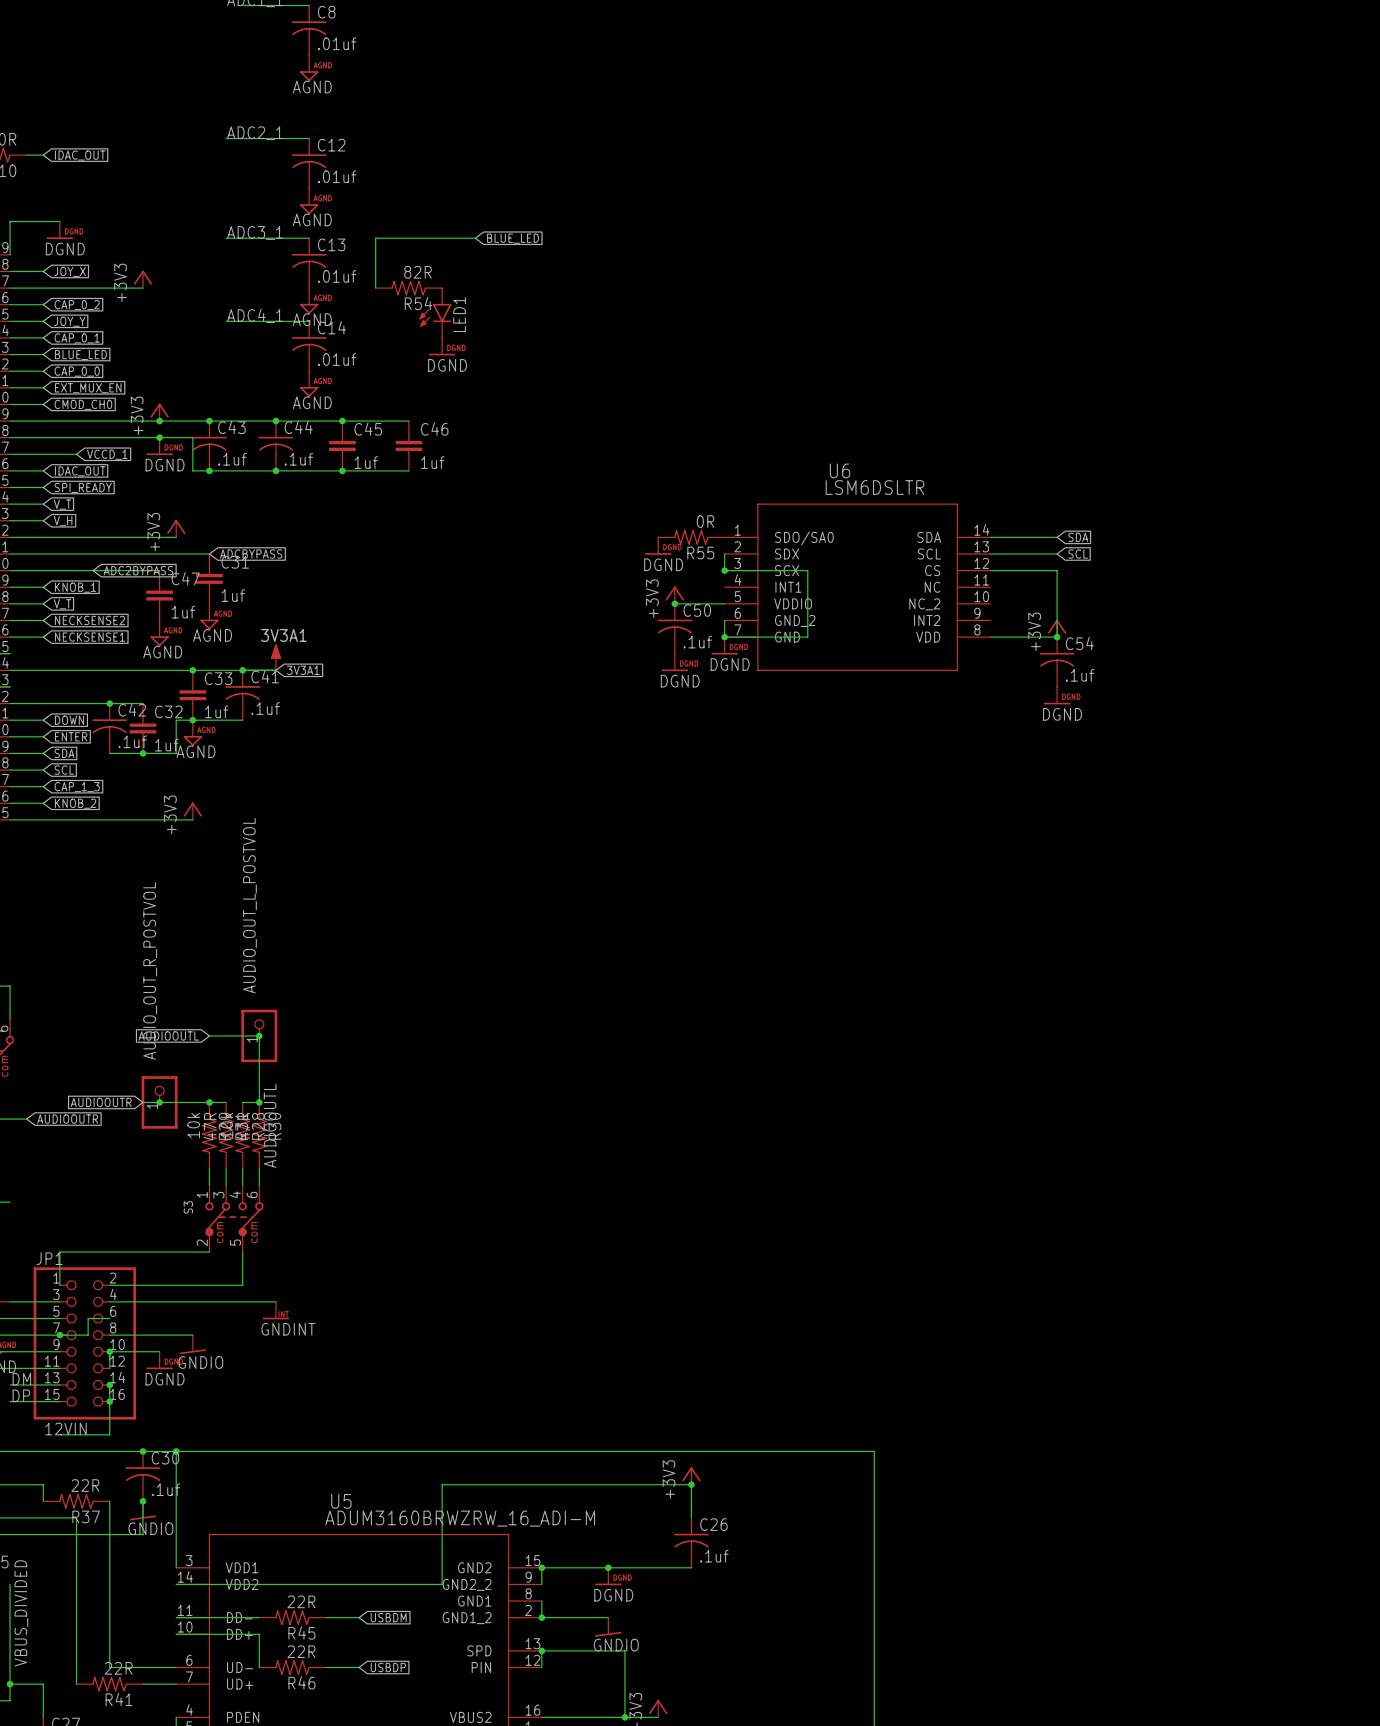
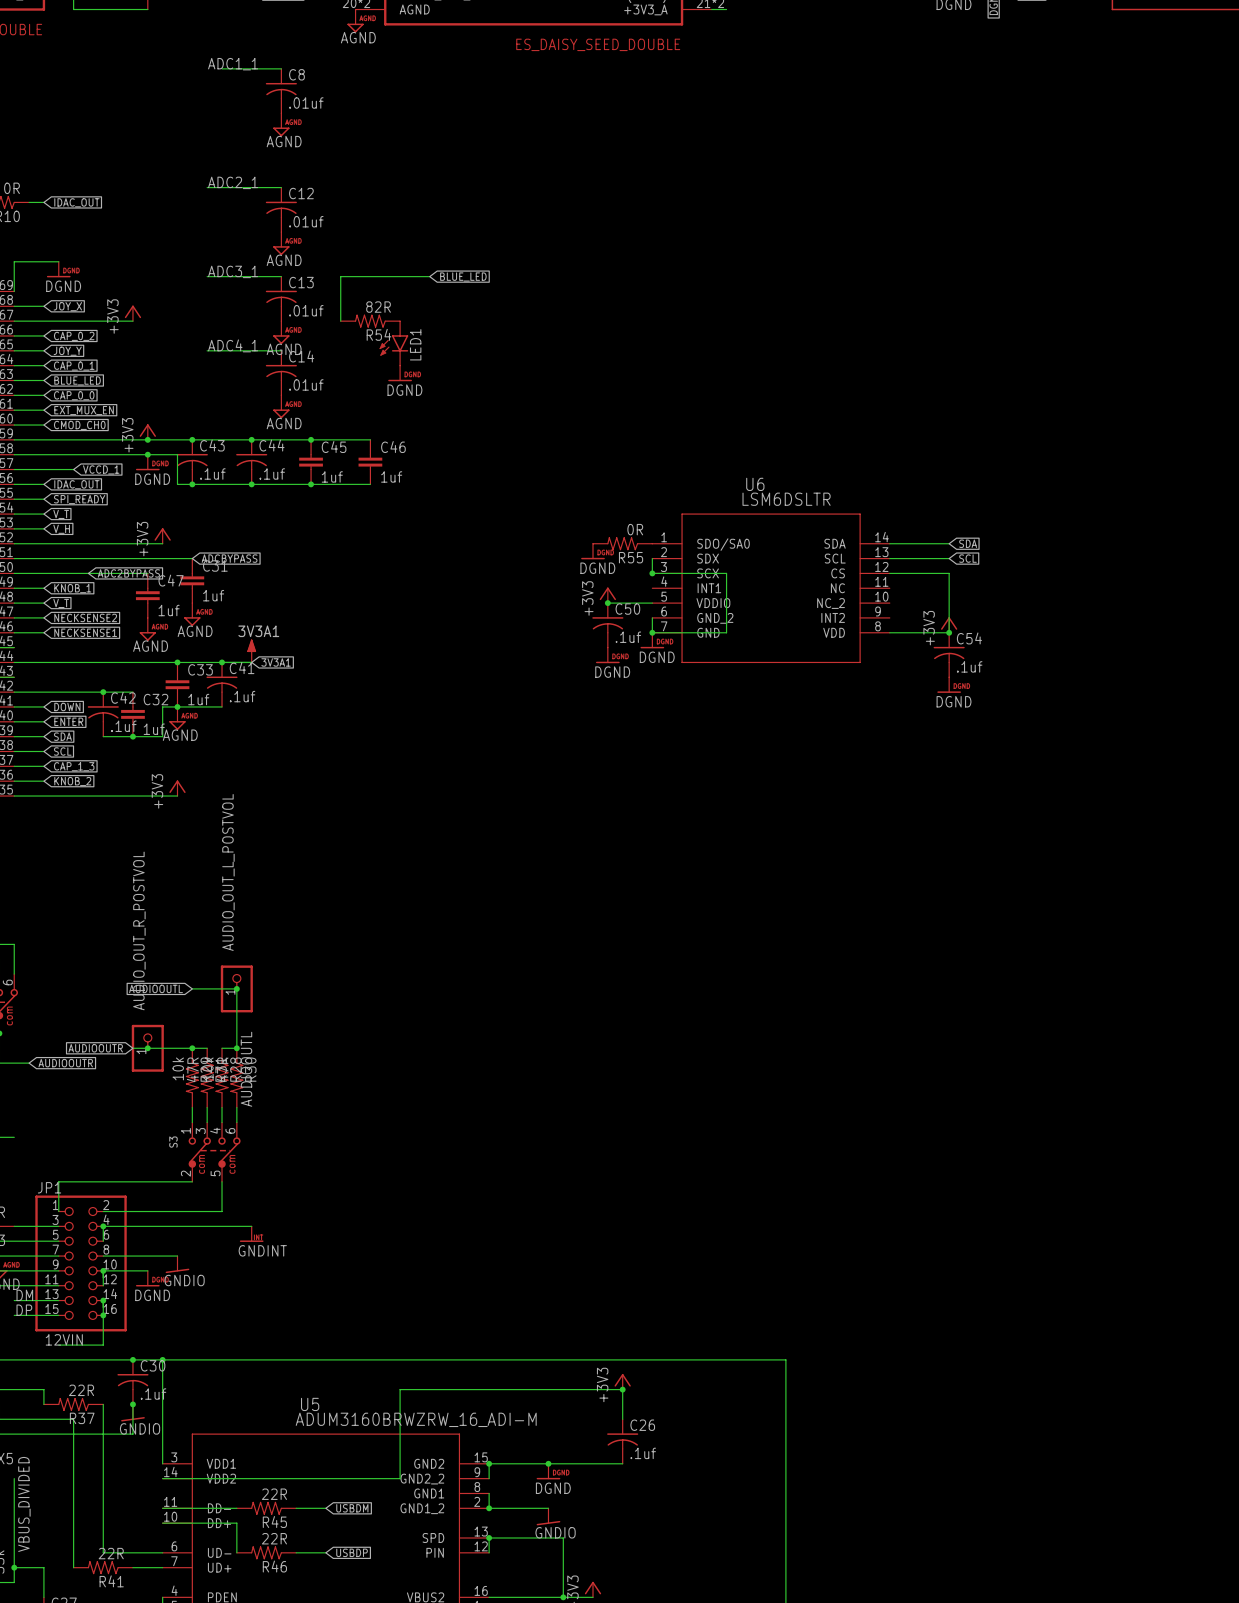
junction: none -> (103, 1226)
wire: (109, 1318) (88, 1318) (88, 1335) (59, 1335) -> (103, 1241) (103, 1226)
junction: (59, 1335) -> none

